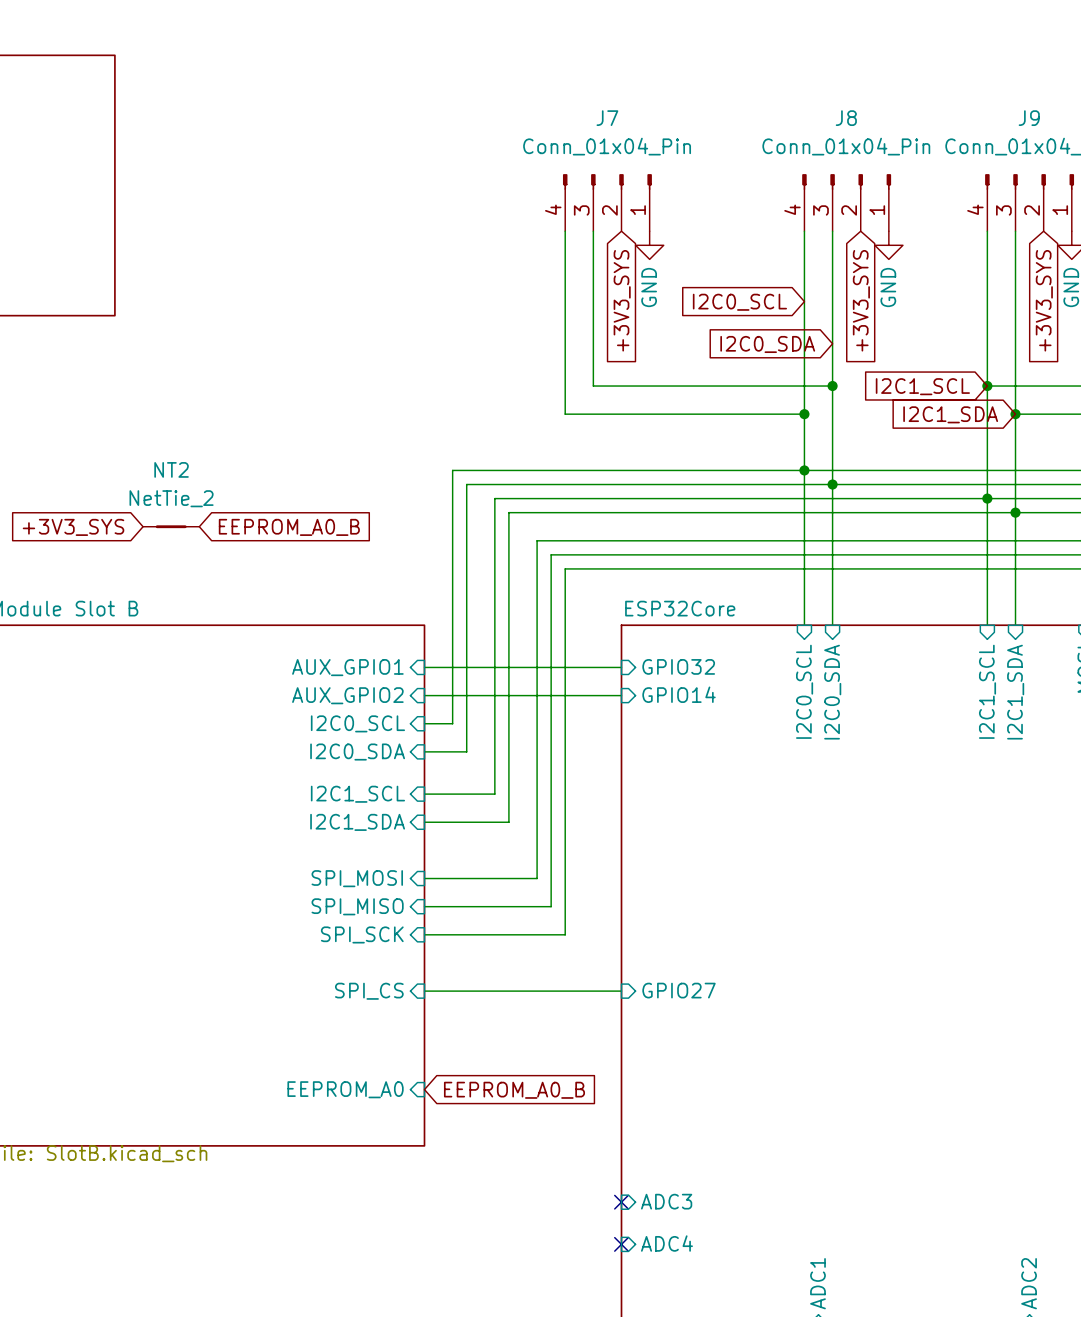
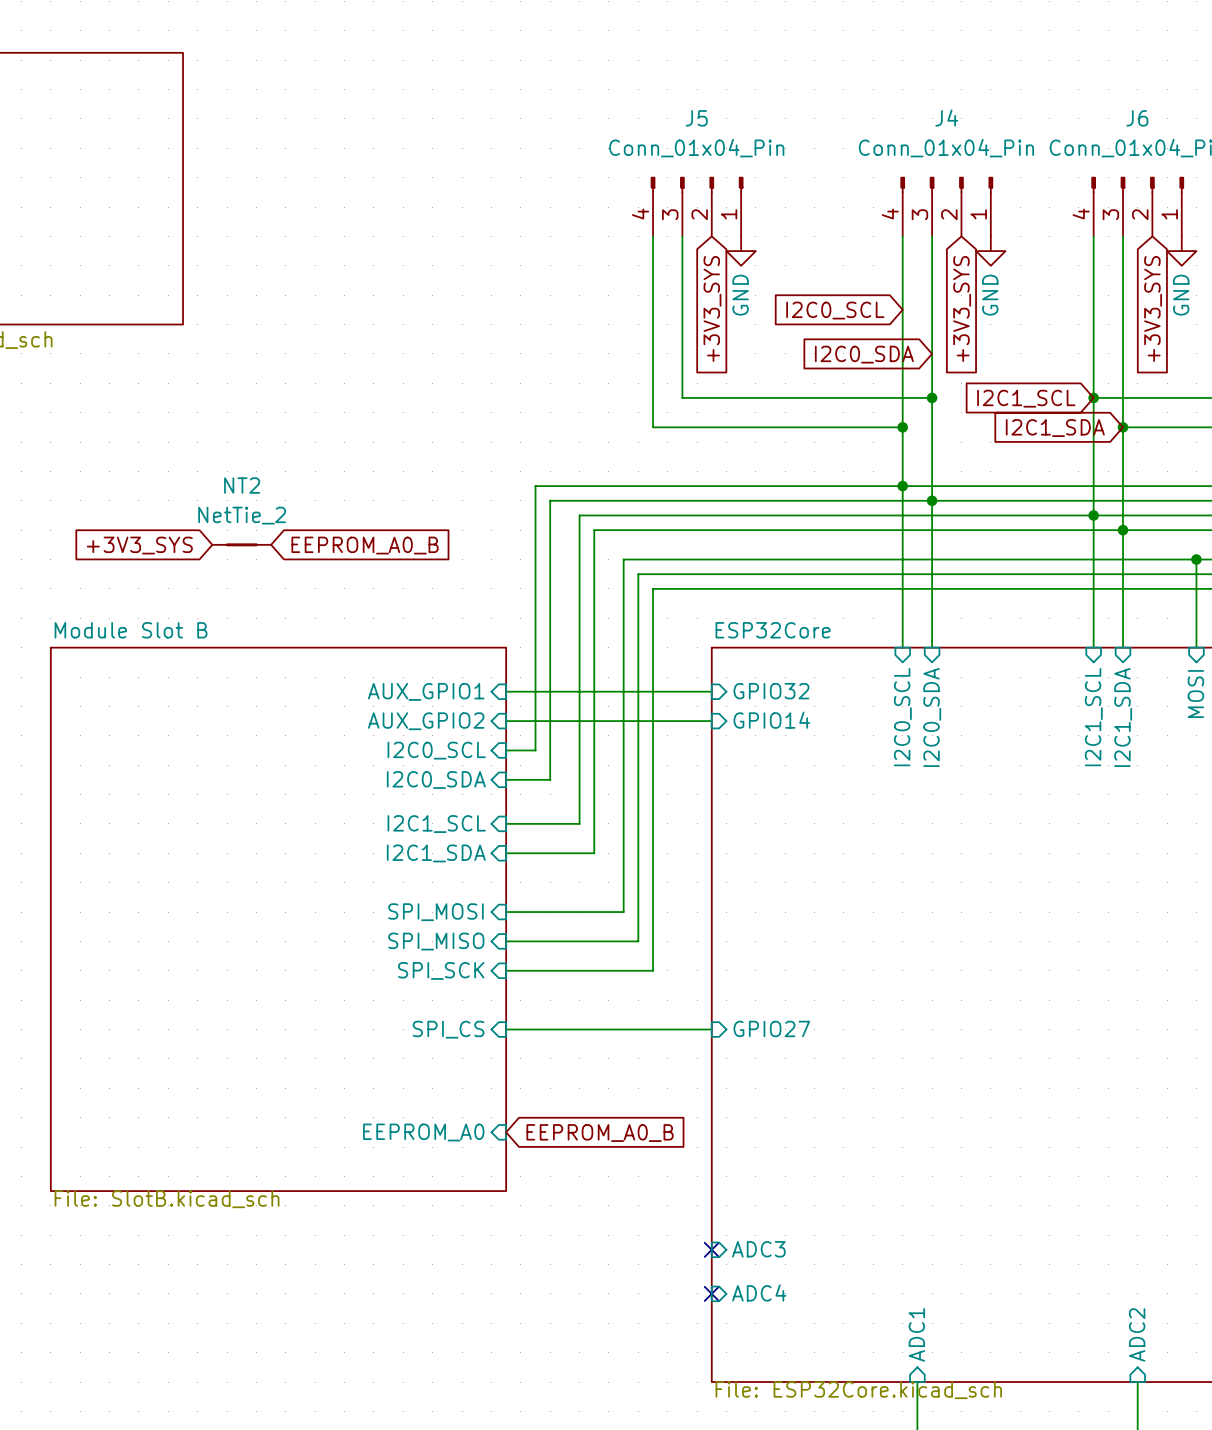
J7 name: J7 (607, 118) -> J5 (696, 118)
J8 name: J8 (846, 118) -> J4 (946, 118)
J9 name: J9 (1029, 118) -> J6 (1137, 118)

